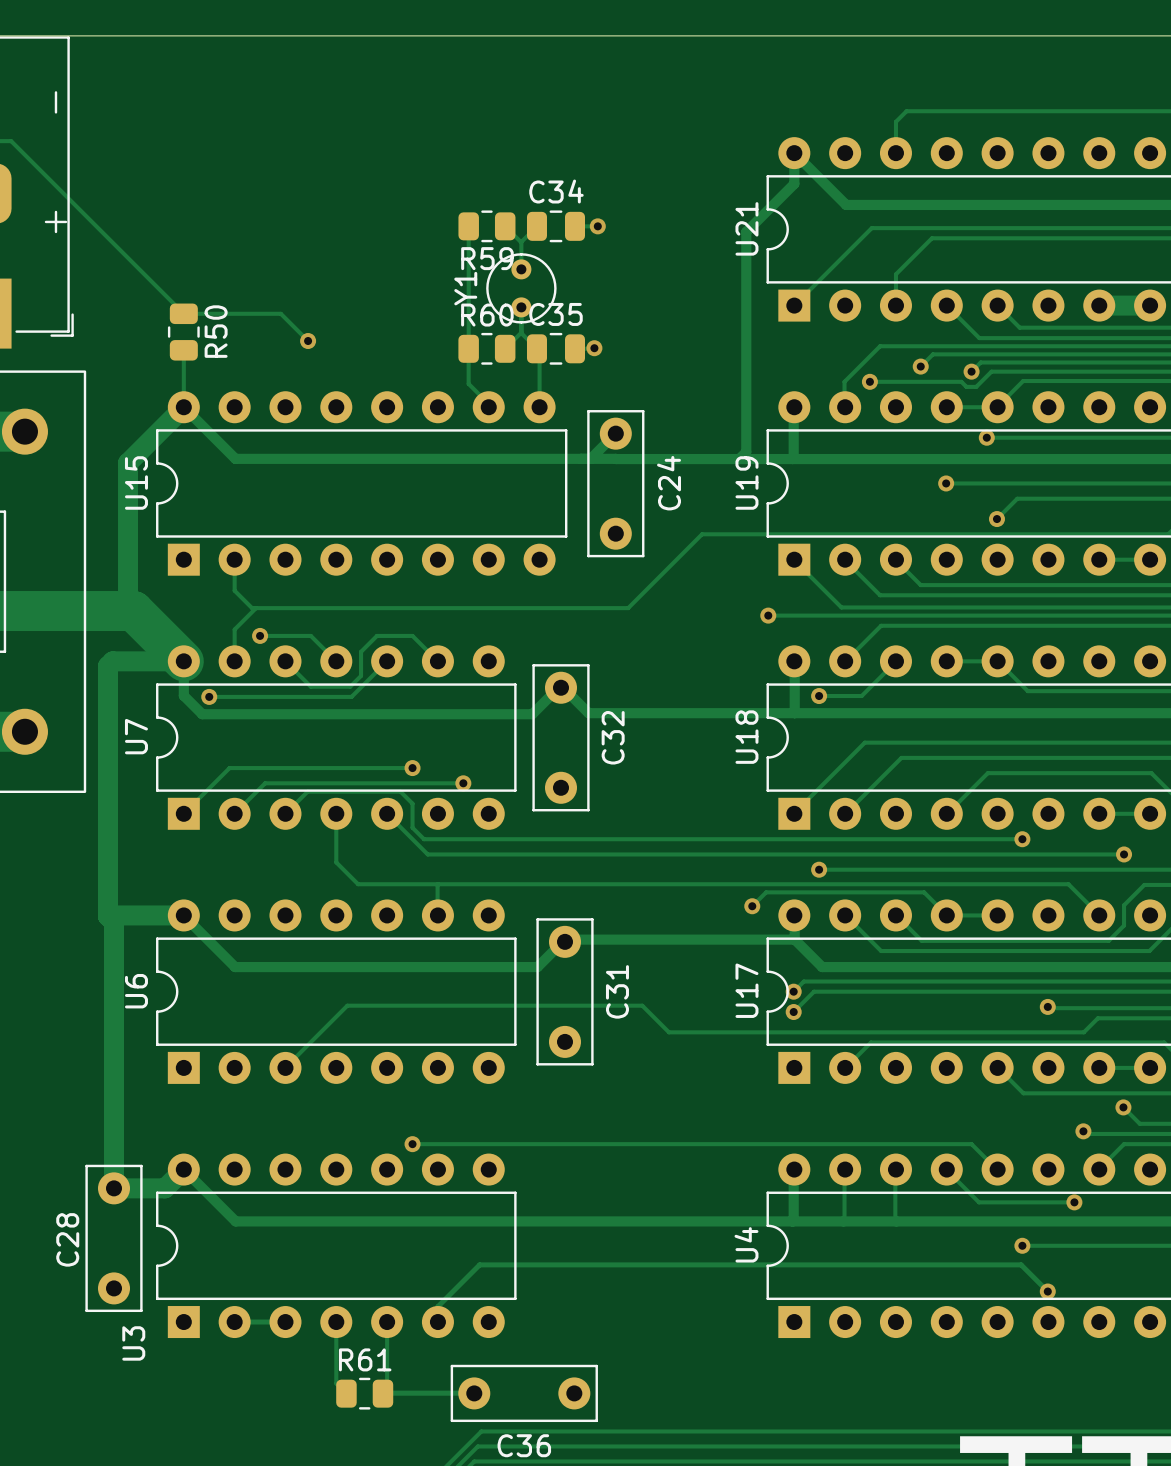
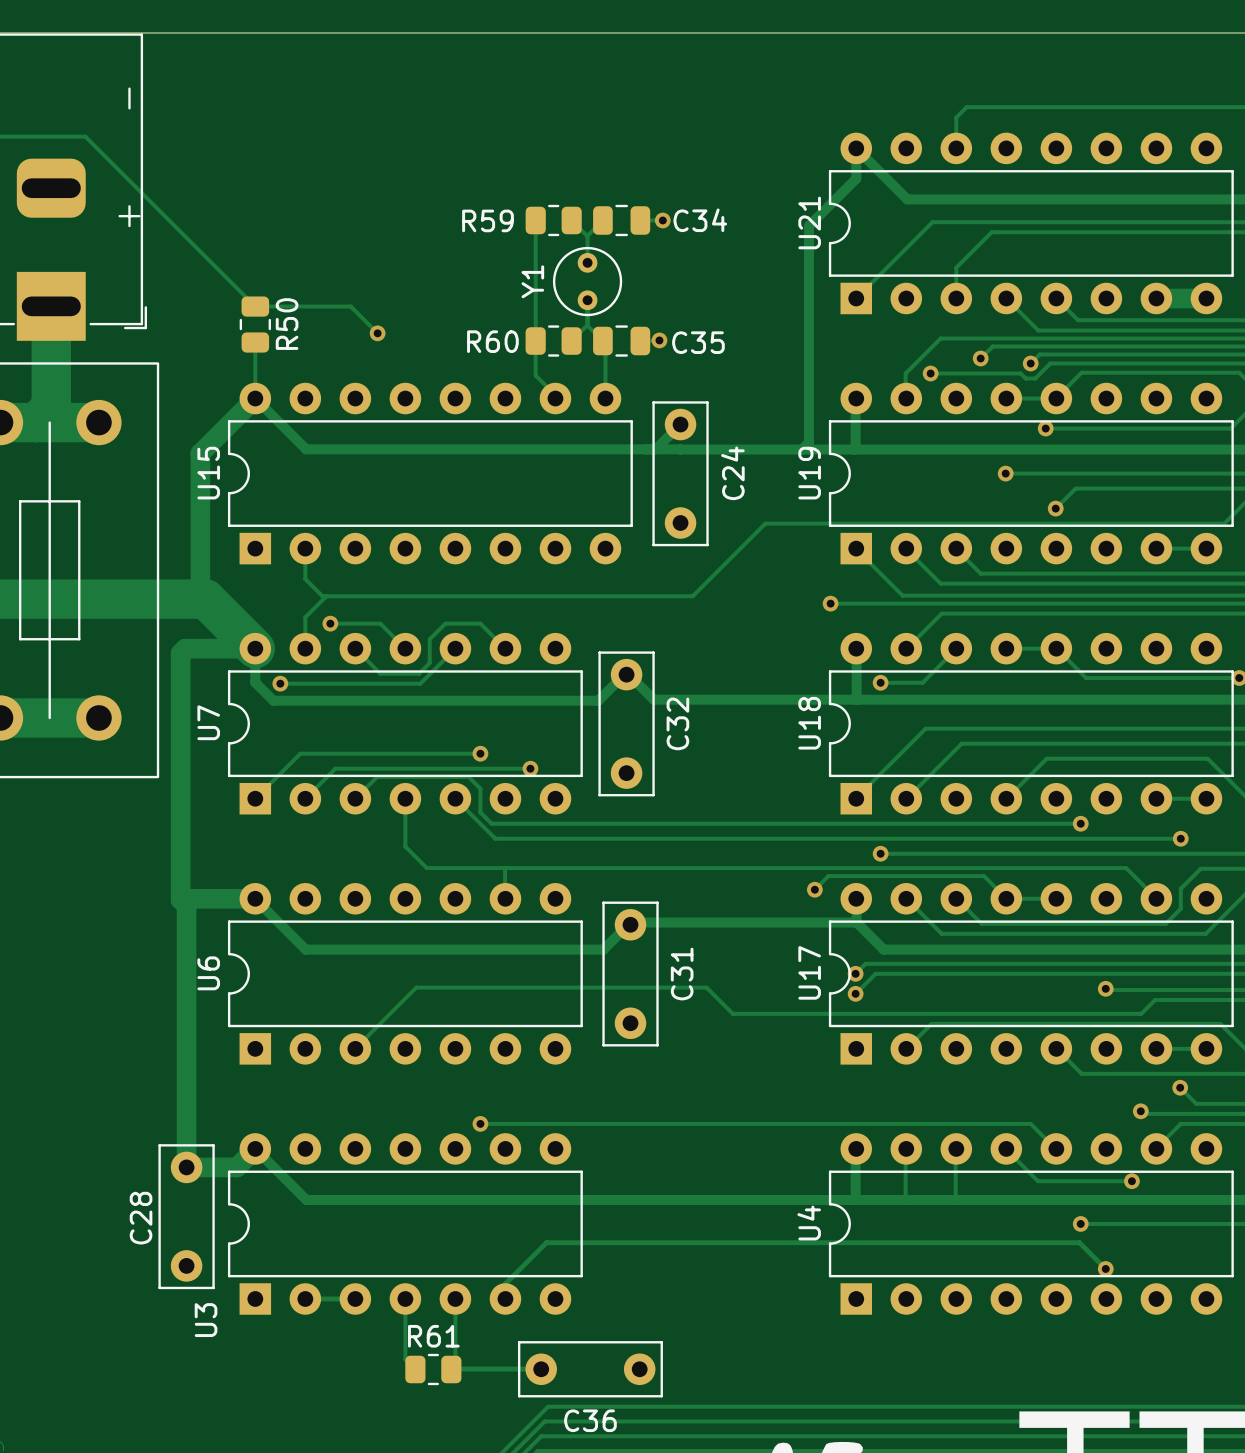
C34 name position: C34 (556, 191) -> C34 (700, 220)
R59 name position: R59 (487, 258) -> R59 (487, 220)
C35 name position: C35 (555, 314) -> C35 (698, 342)
R60 name position: R60 (487, 315) -> R60 (492, 341)

